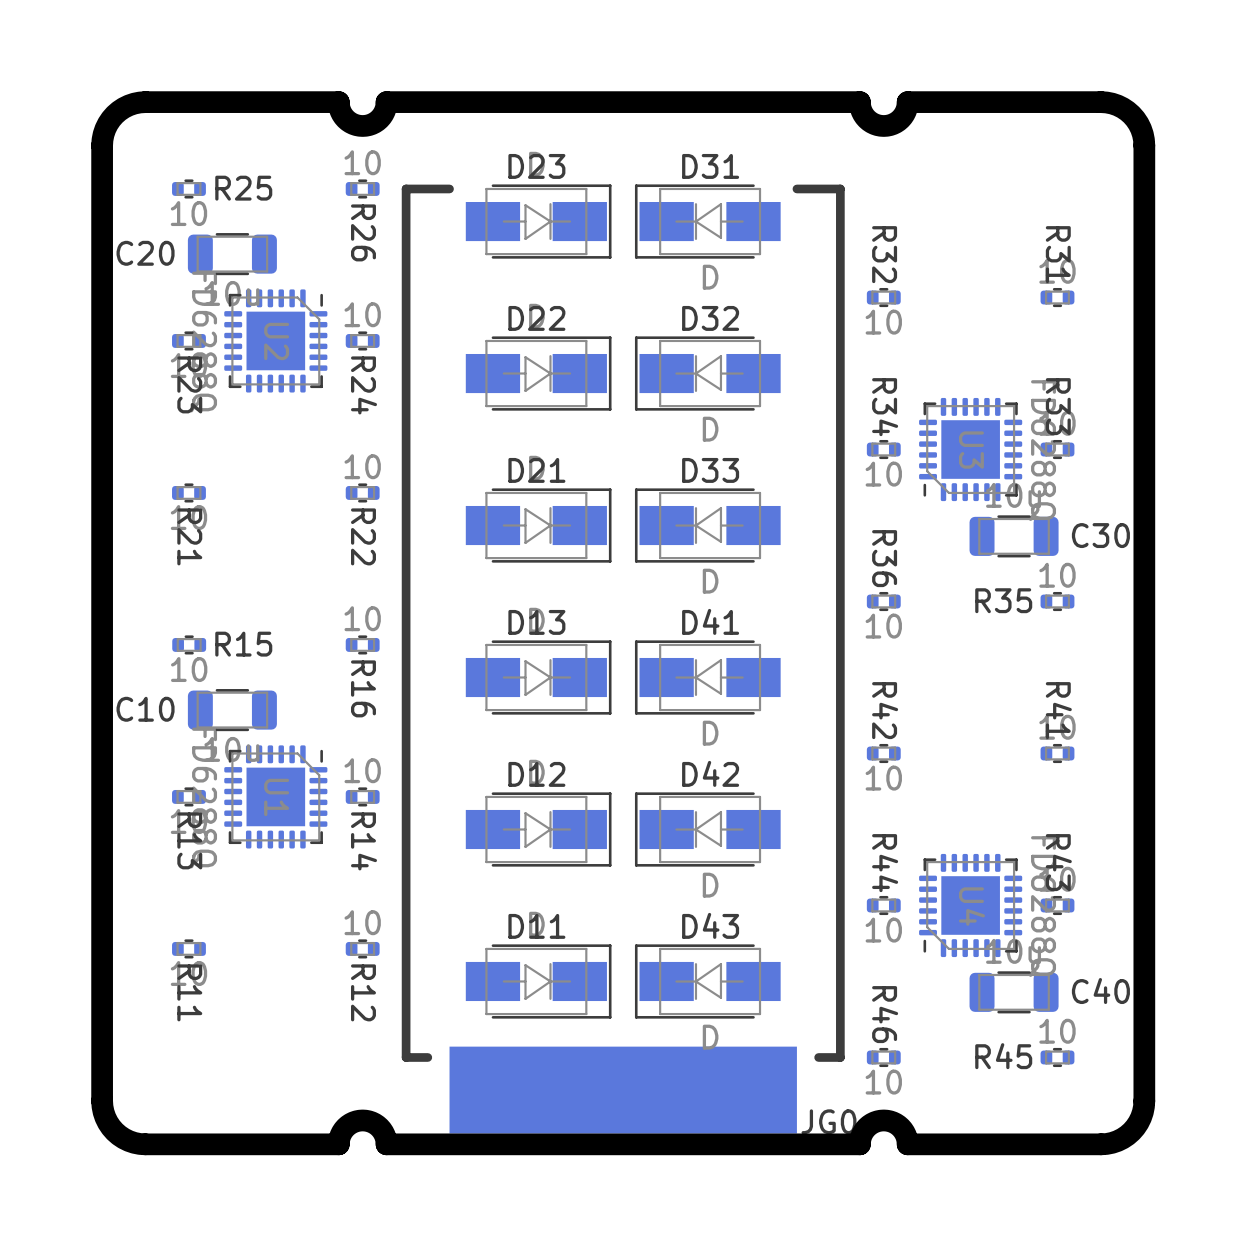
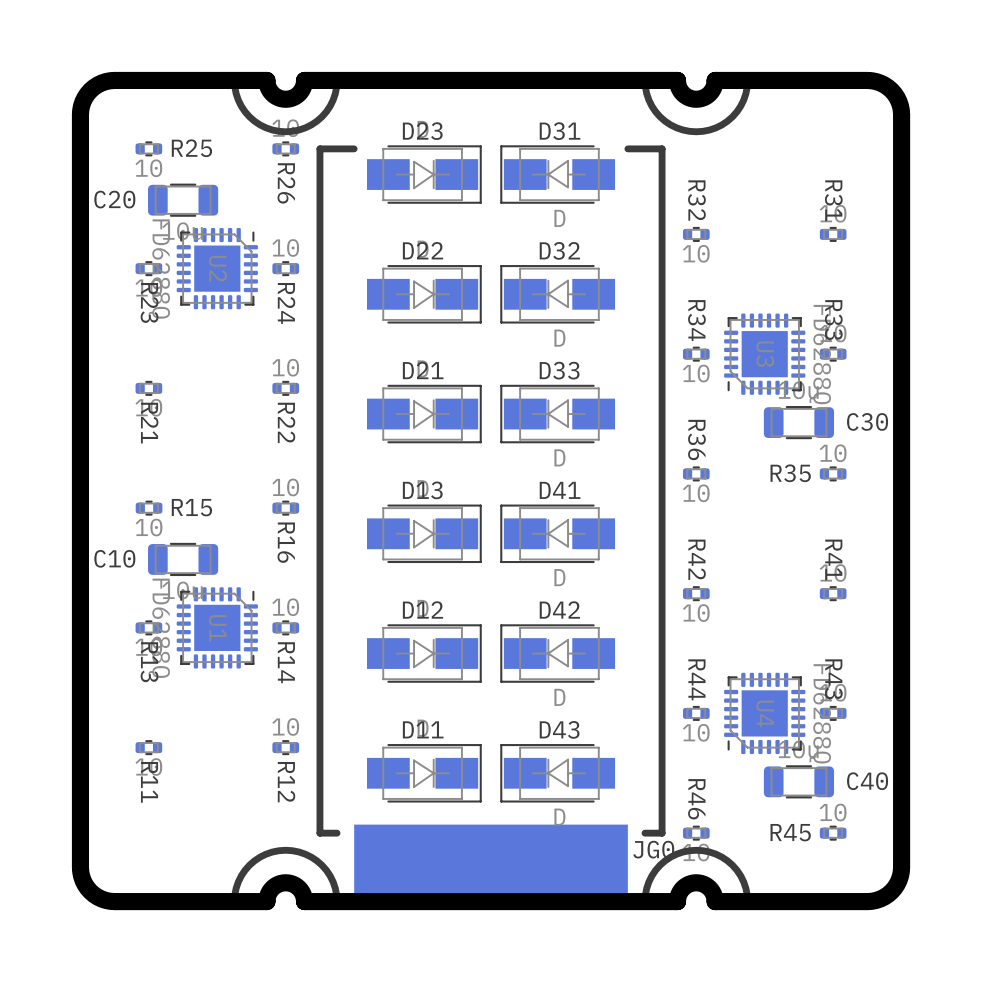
line: none -> (337, 80) (333, 100) (322, 116) (305, 127) (285, 131) (266, 127) (249, 116) (238, 100) (234, 80)
line: none -> (747, 80) (743, 100) (732, 116) (715, 127) (696, 131) (676, 127) (660, 116) (648, 100) (644, 80)
JG0 name position: JG0 (828, 1121) -> JG0 (653, 849)
line: none -> (337, 901) (333, 881) (322, 865) (305, 854) (285, 850) (266, 854) (249, 865) (238, 881) (234, 901)
line: none -> (747, 901) (743, 881) (732, 865) (715, 854) (696, 850) (676, 854) (660, 865) (648, 881) (644, 901)

